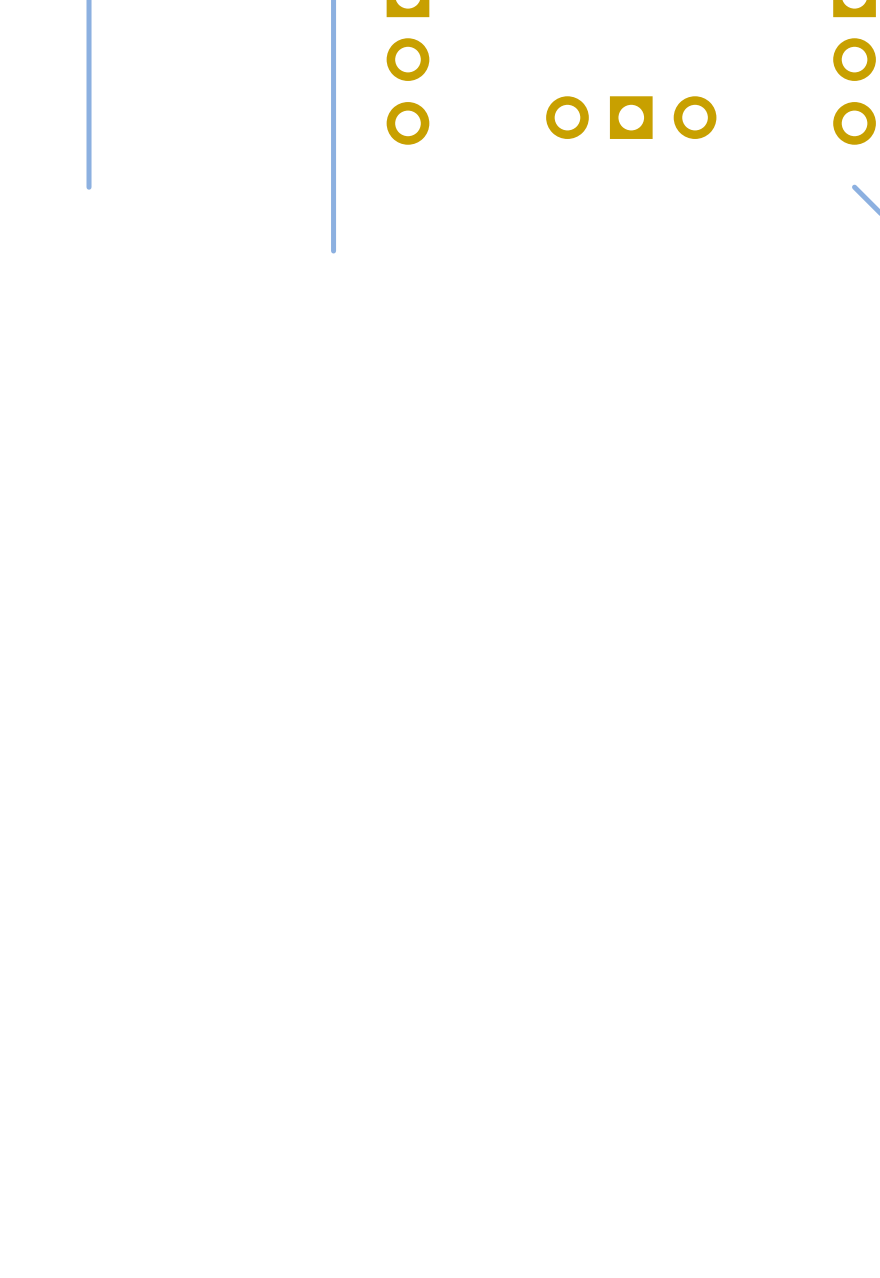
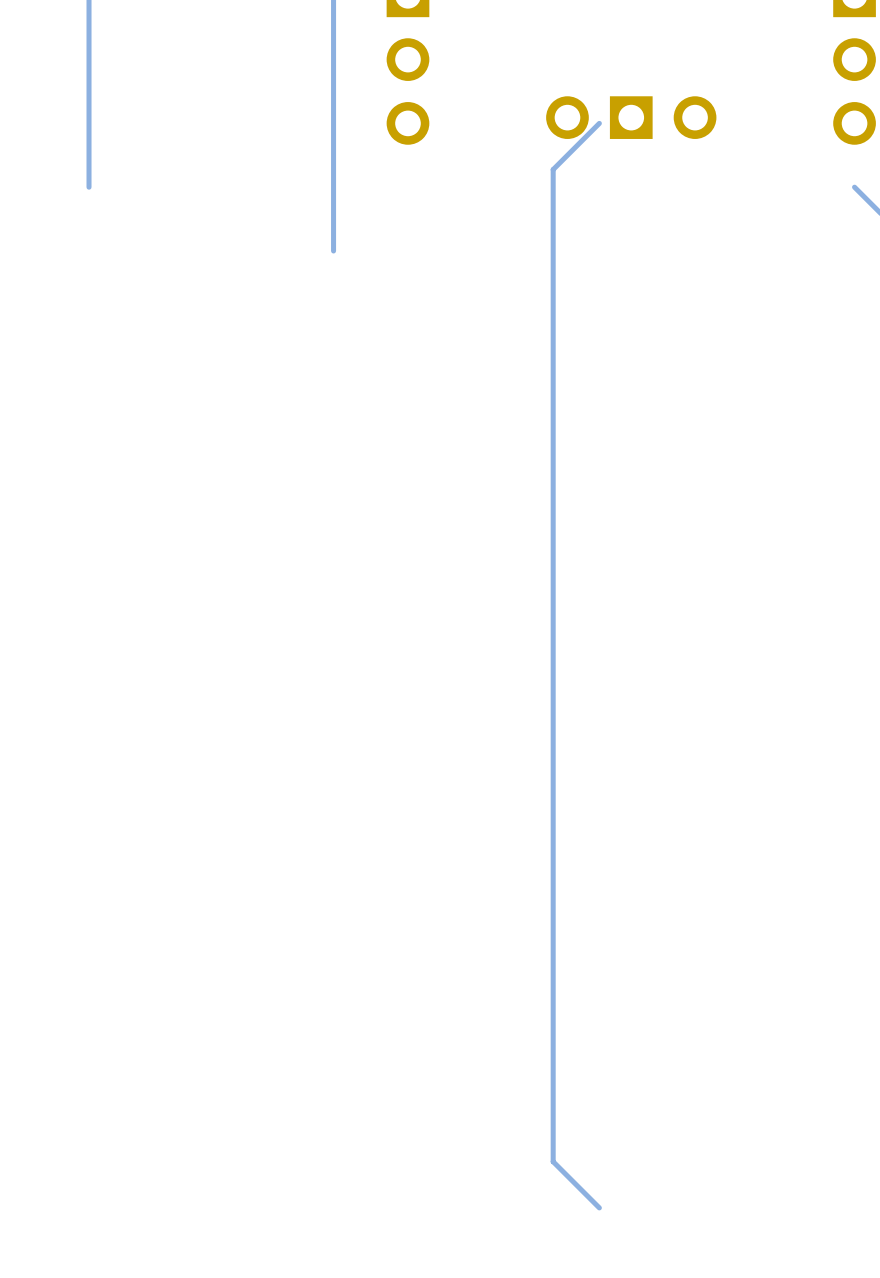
track: none -> (599, 123) (553, 169) (553, 1161) (599, 1207)

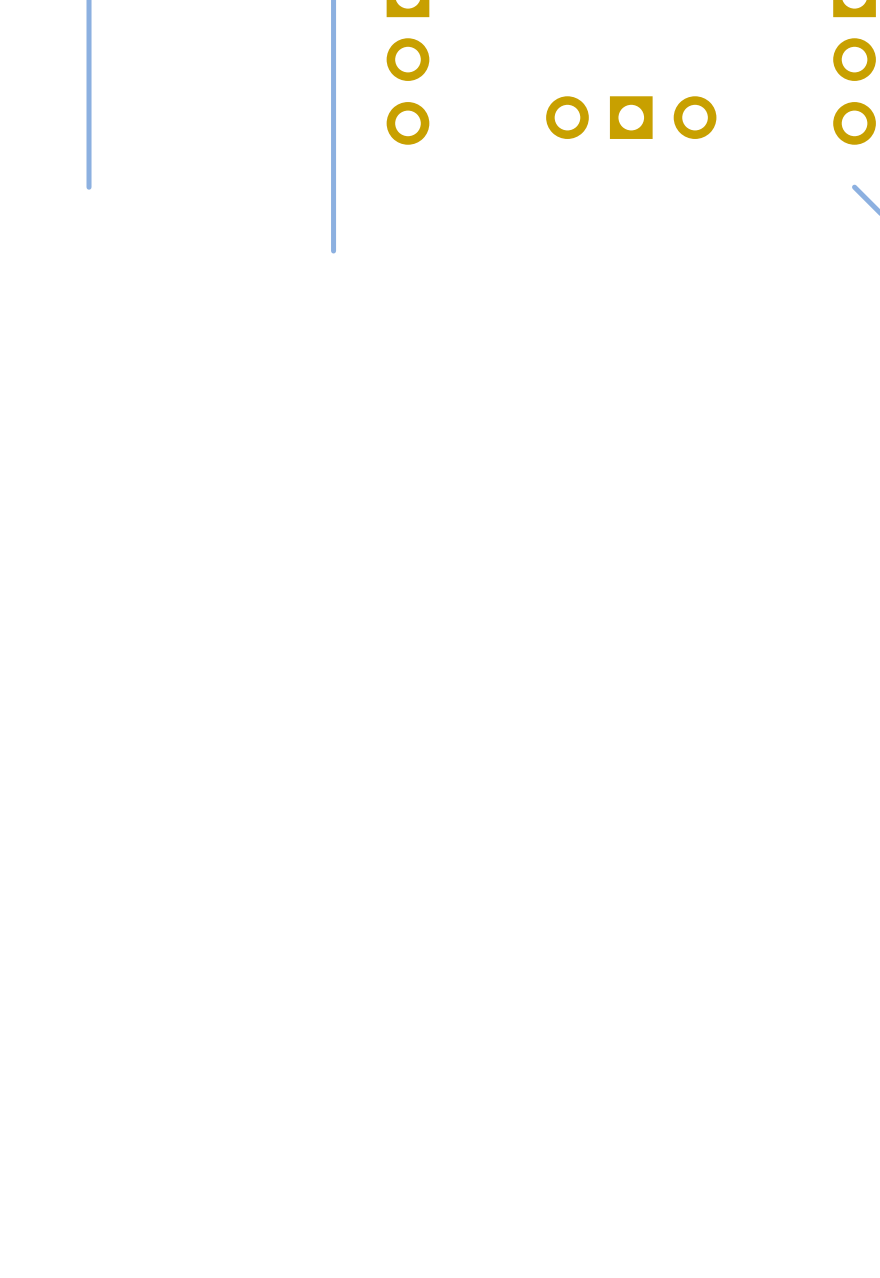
track: (599, 123) (553, 169) (553, 1161) (599, 1207) -> none

